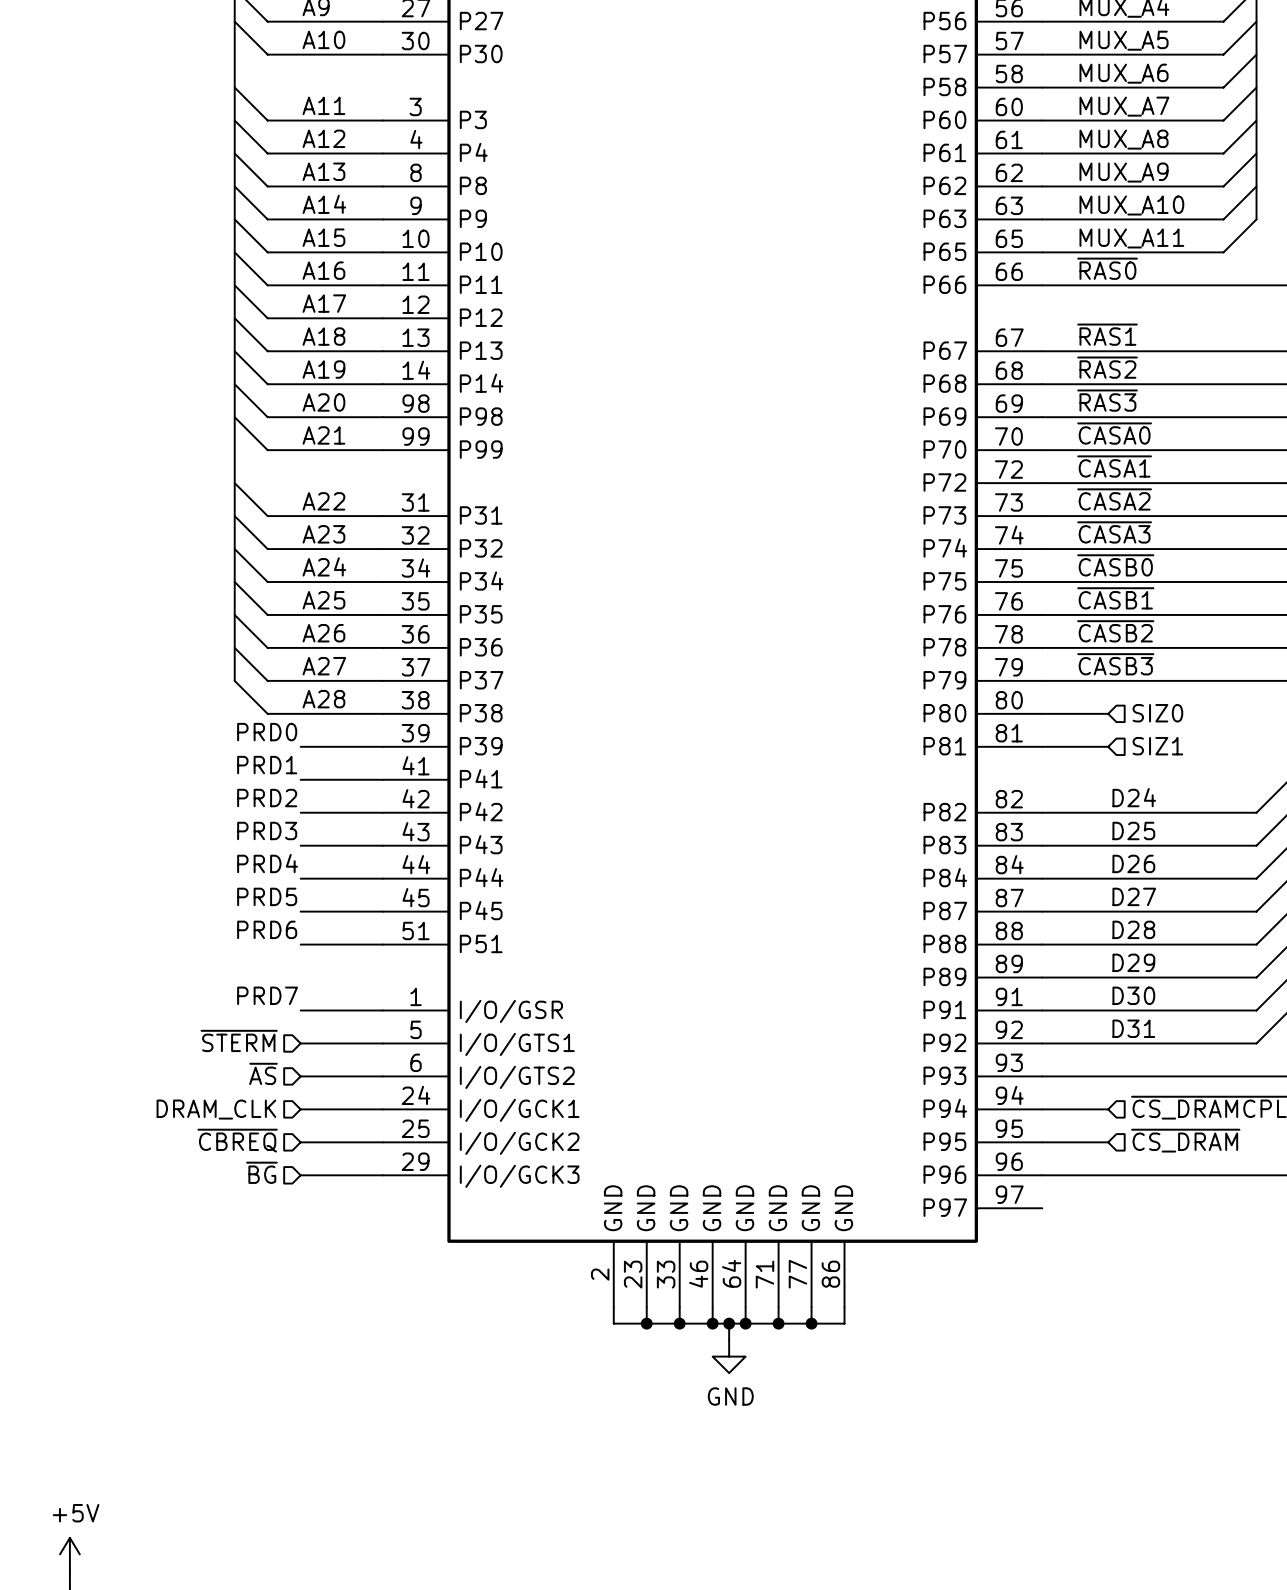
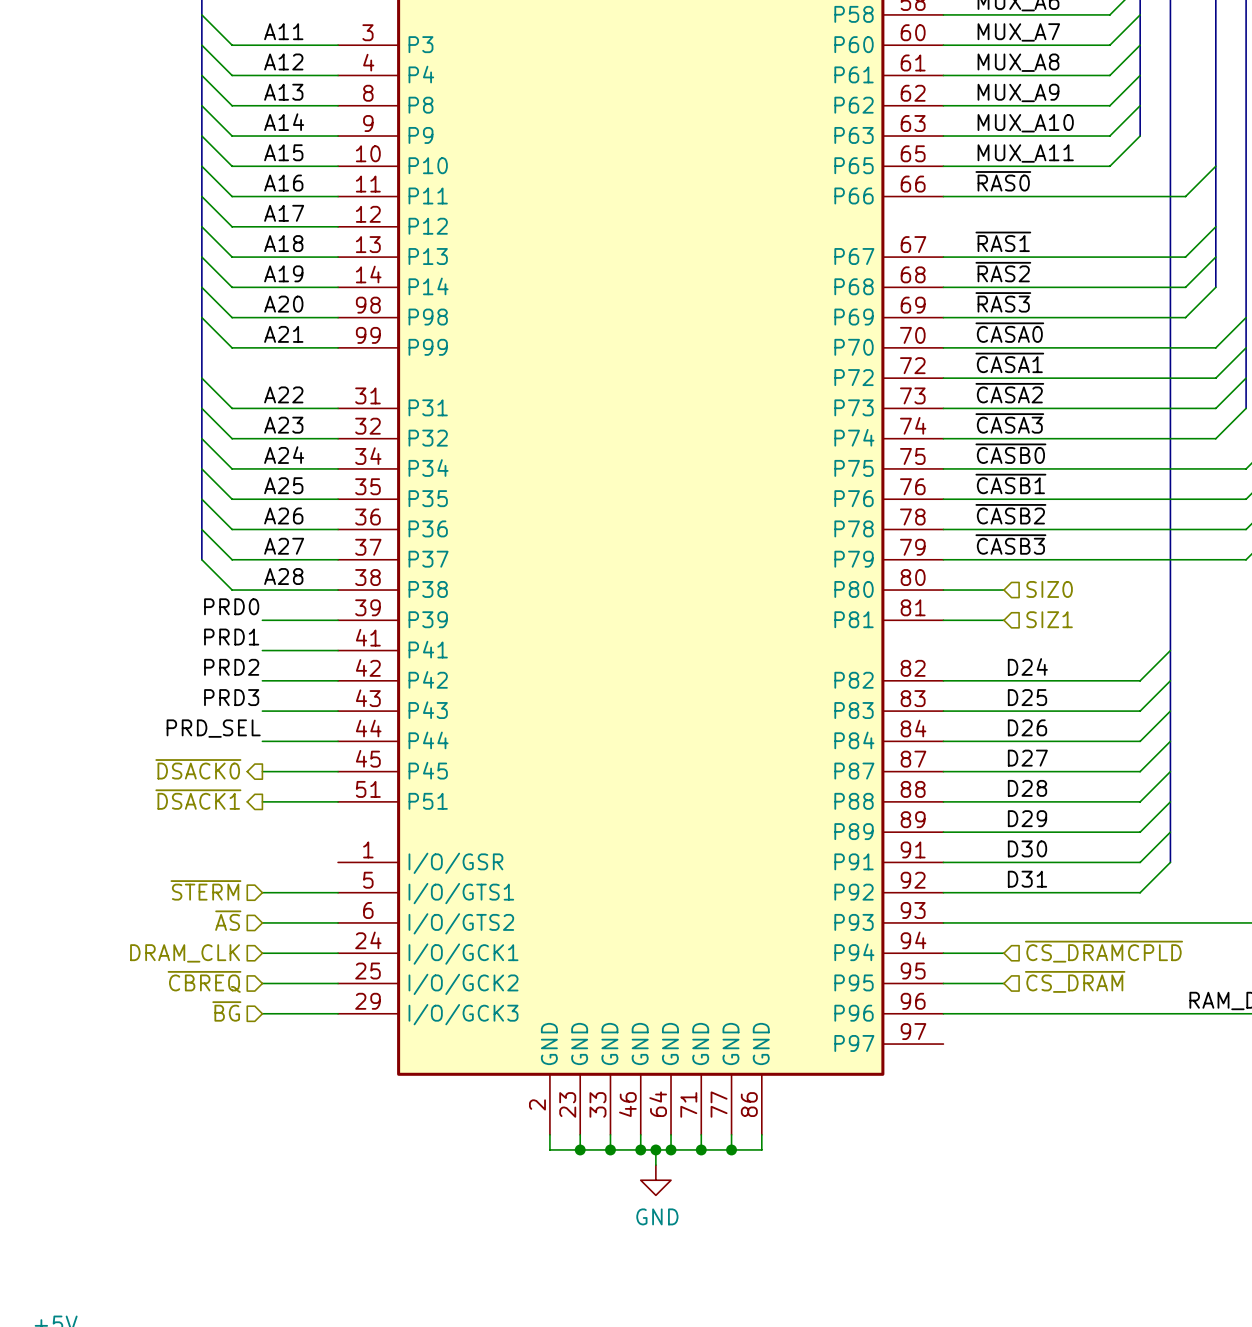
label: PRD4 (267, 863) -> PRD_SEL (213, 728)
label: PRD5 (267, 896) -> none
hierarchical label: none -> ~{DSACK0} (198, 769)
label: PRD6 (267, 929) -> none
hierarchical label: none -> ~{DSACK1} (198, 799)
label: PRD7 (267, 995) -> none
wire: (300, 1010) (383, 1010) -> none

